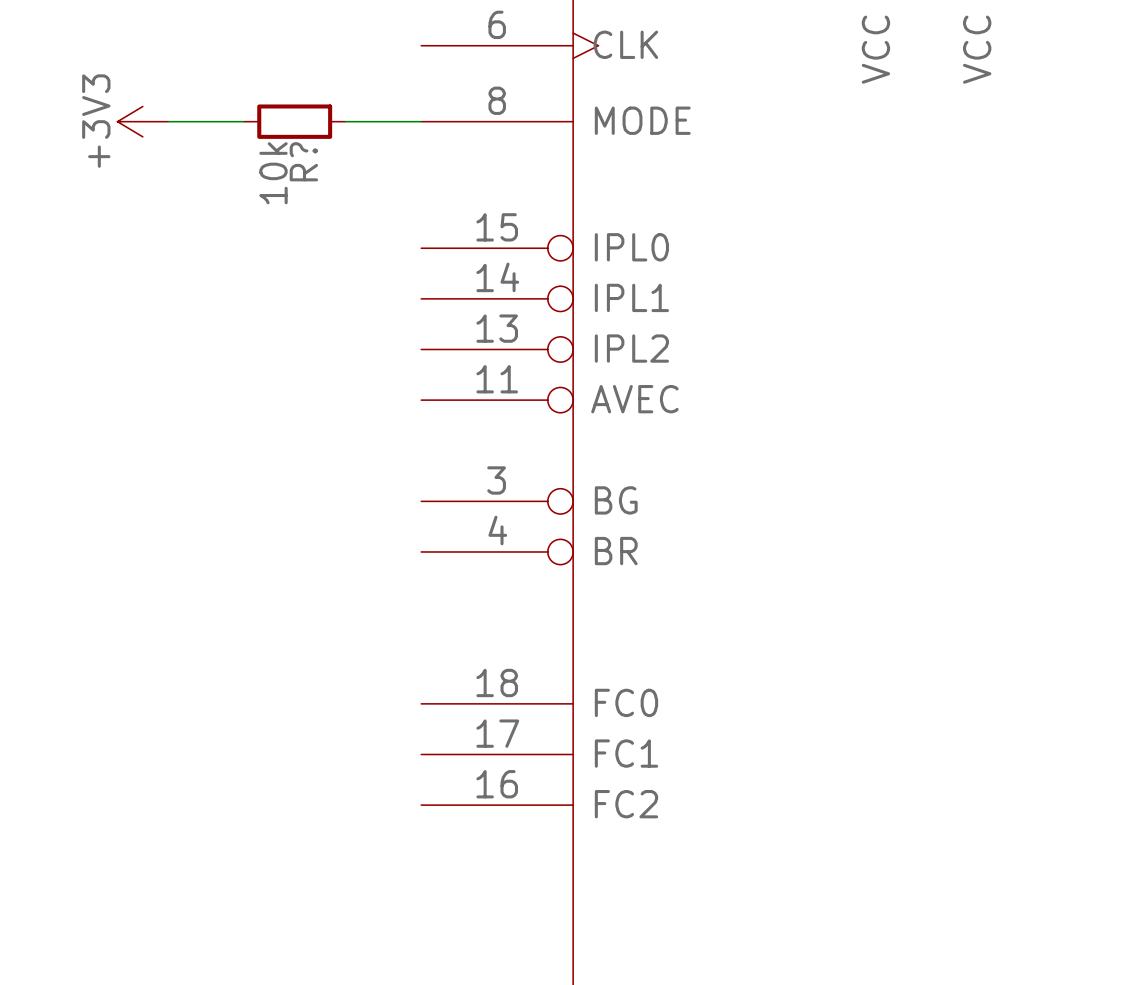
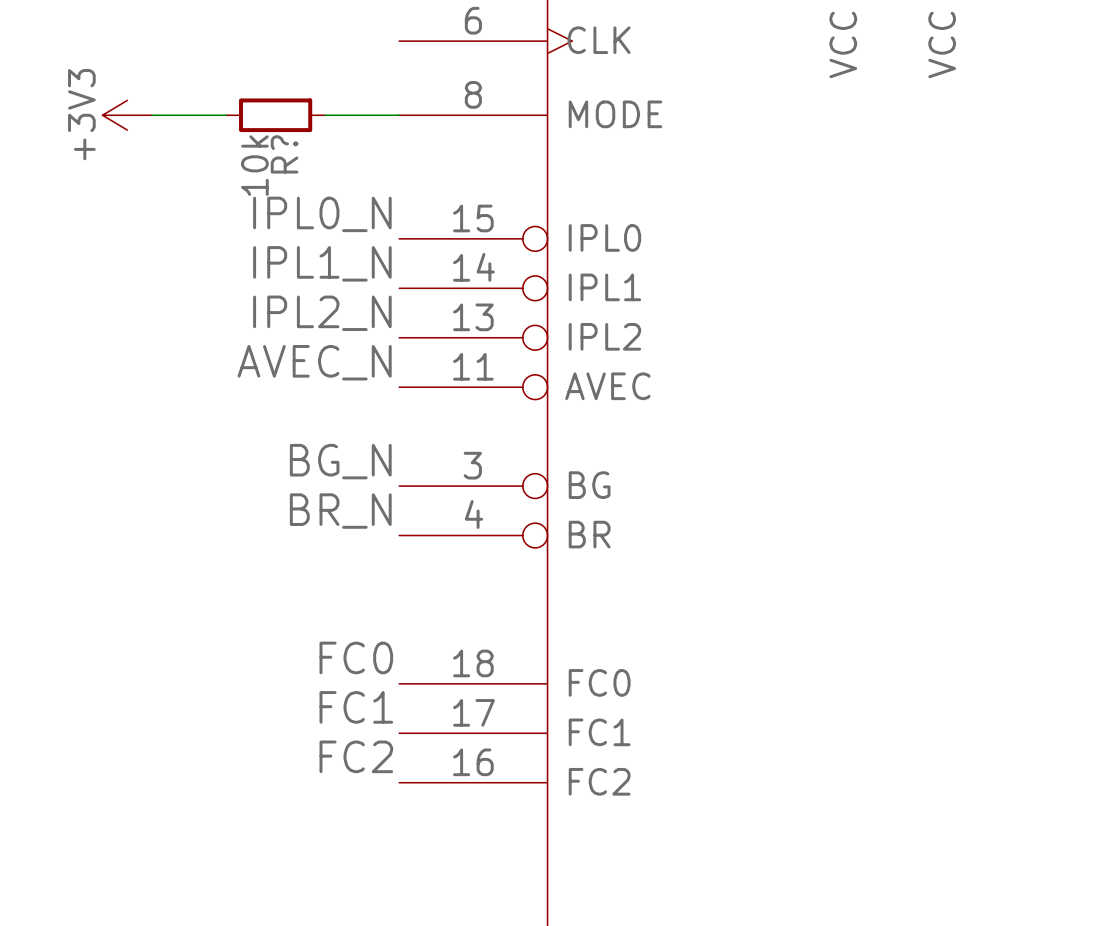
label: none -> IPL0_N (322, 214)
label: none -> IPL1_N (322, 263)
label: none -> IPL2_N (322, 313)
label: none -> AVEC_N (314, 362)
label: none -> BG_N (340, 461)
label: none -> BR_N (340, 511)
label: none -> FC0 (356, 657)
label: none -> FC1 (356, 707)
label: none -> FC2 (356, 756)

